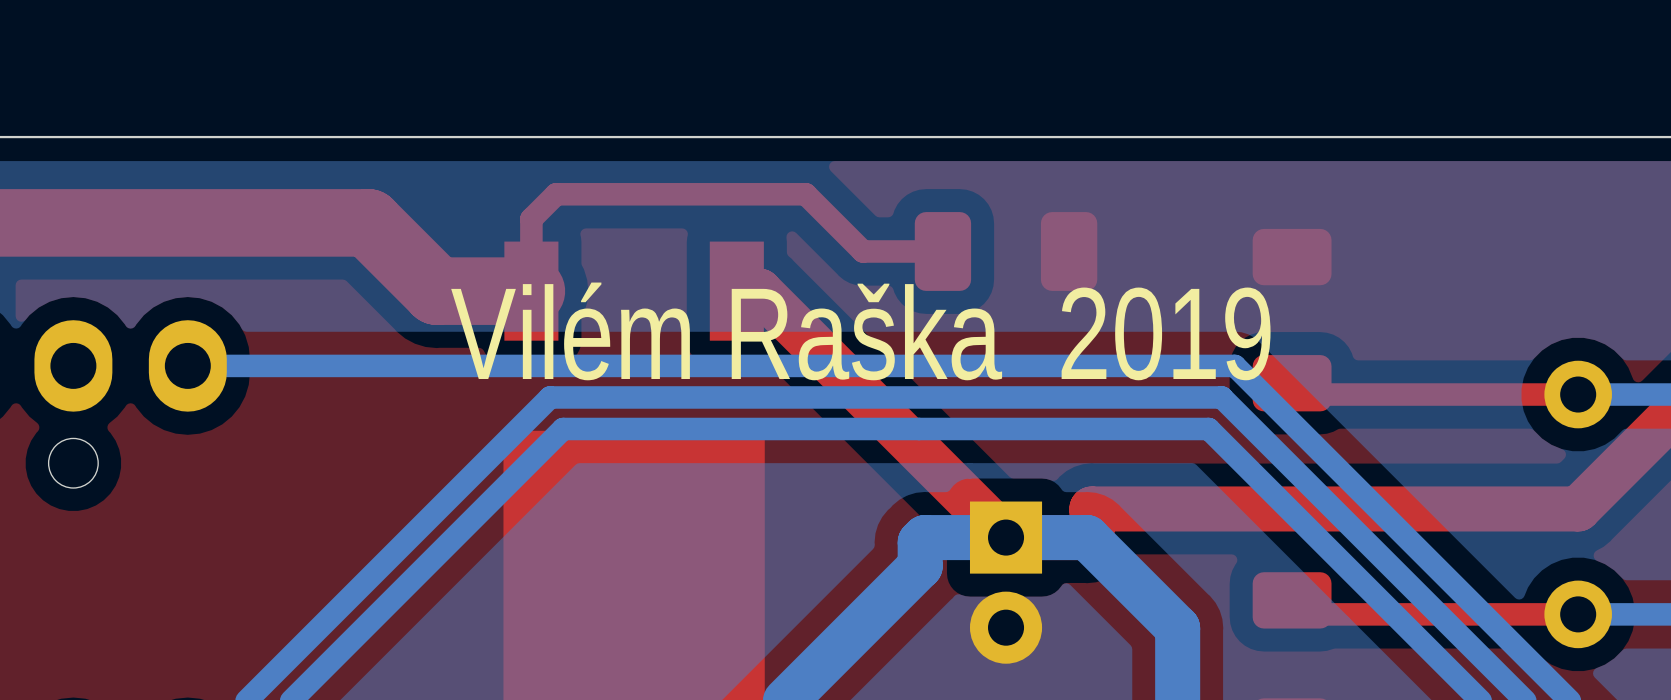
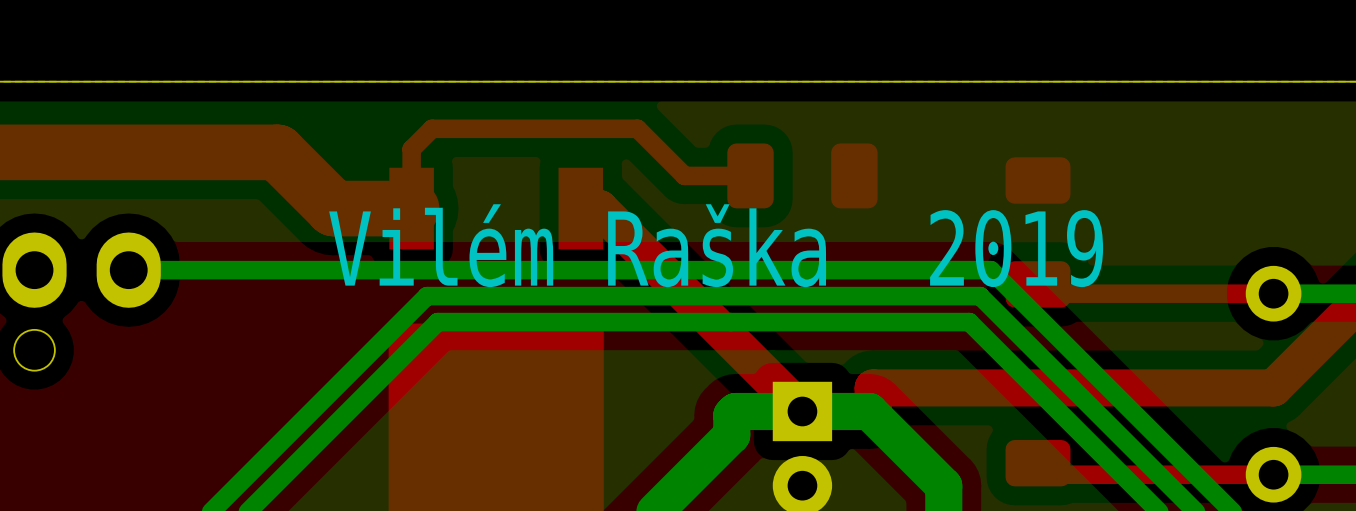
text position: Vilém Raška 2019 (860, 331) -> Vilém Raška 2019 (716, 245)

